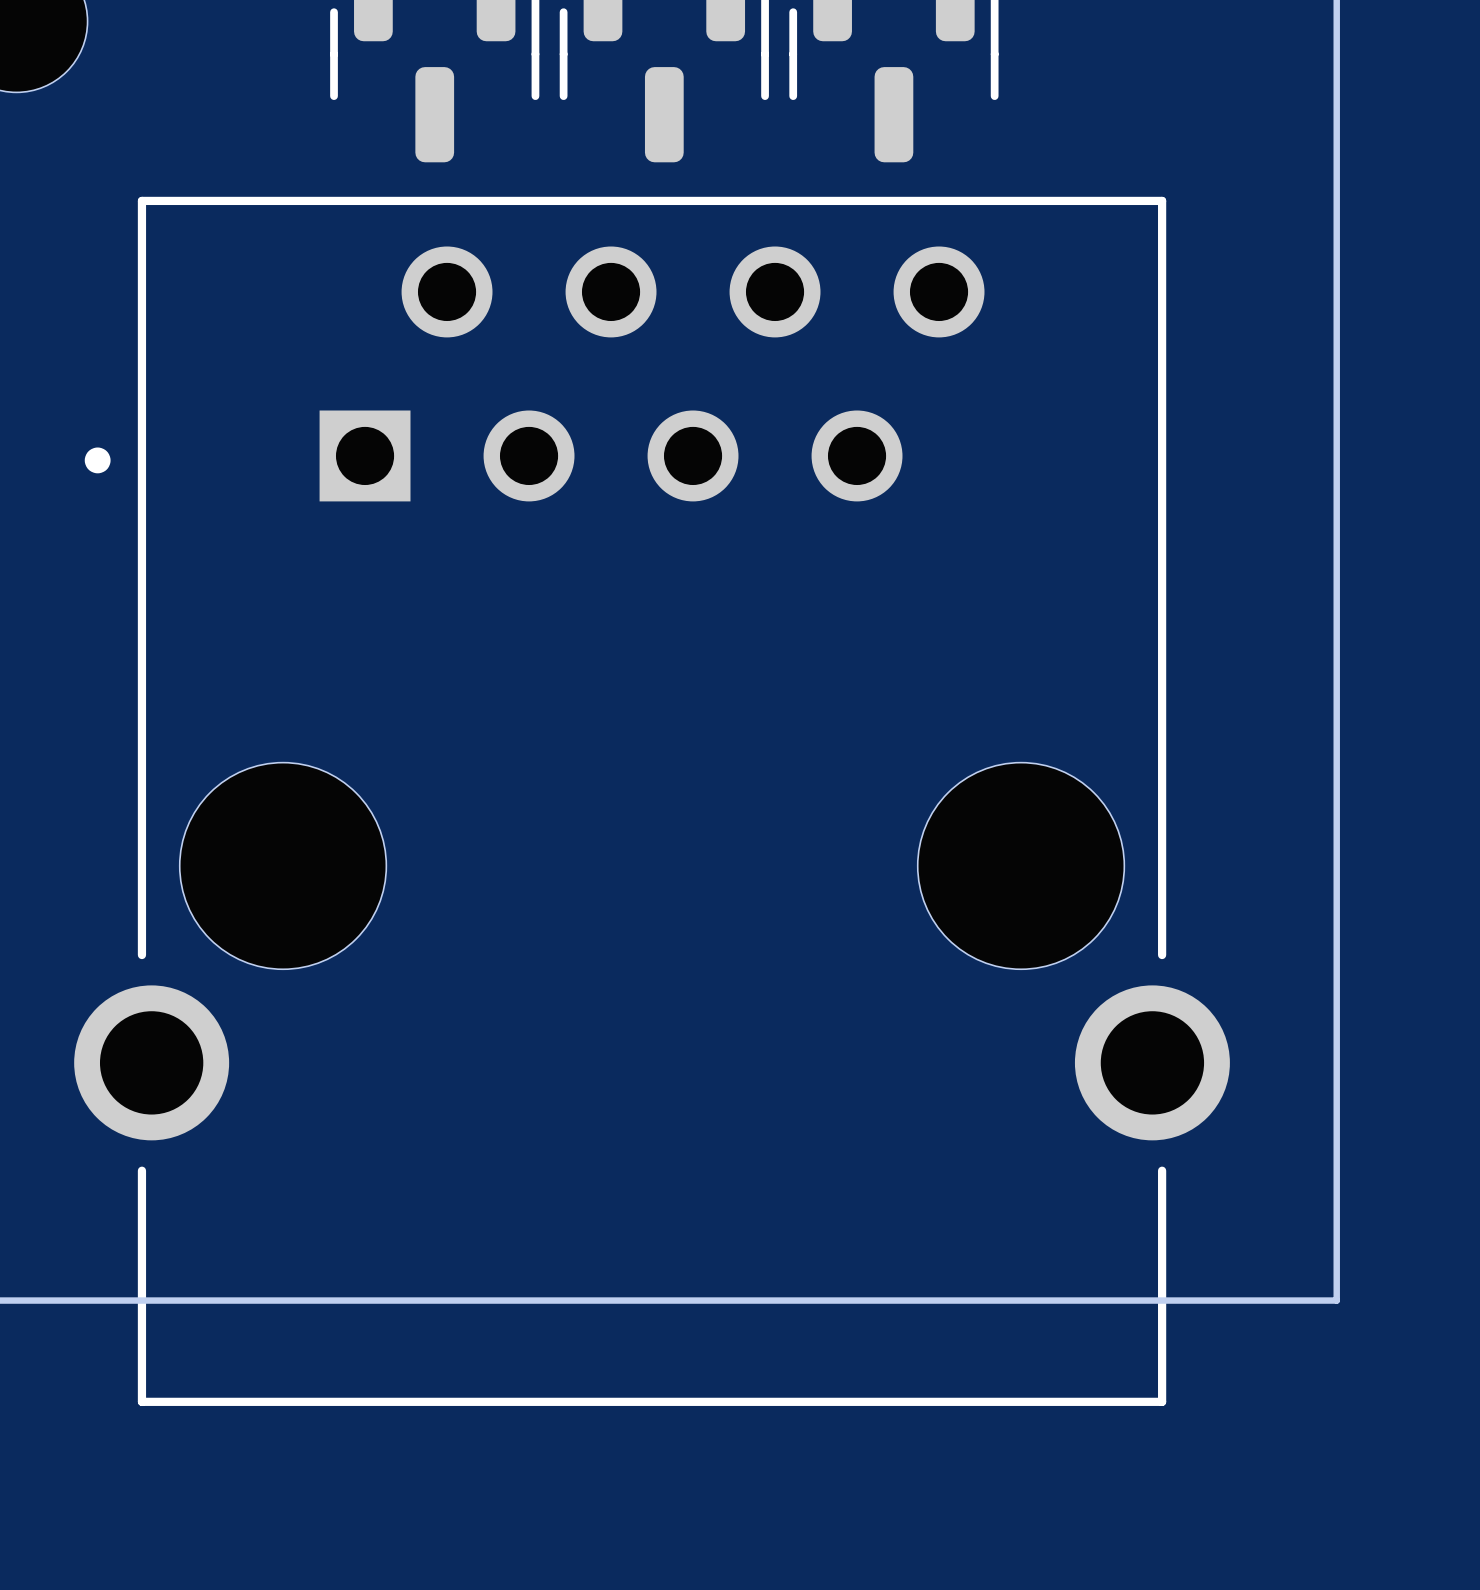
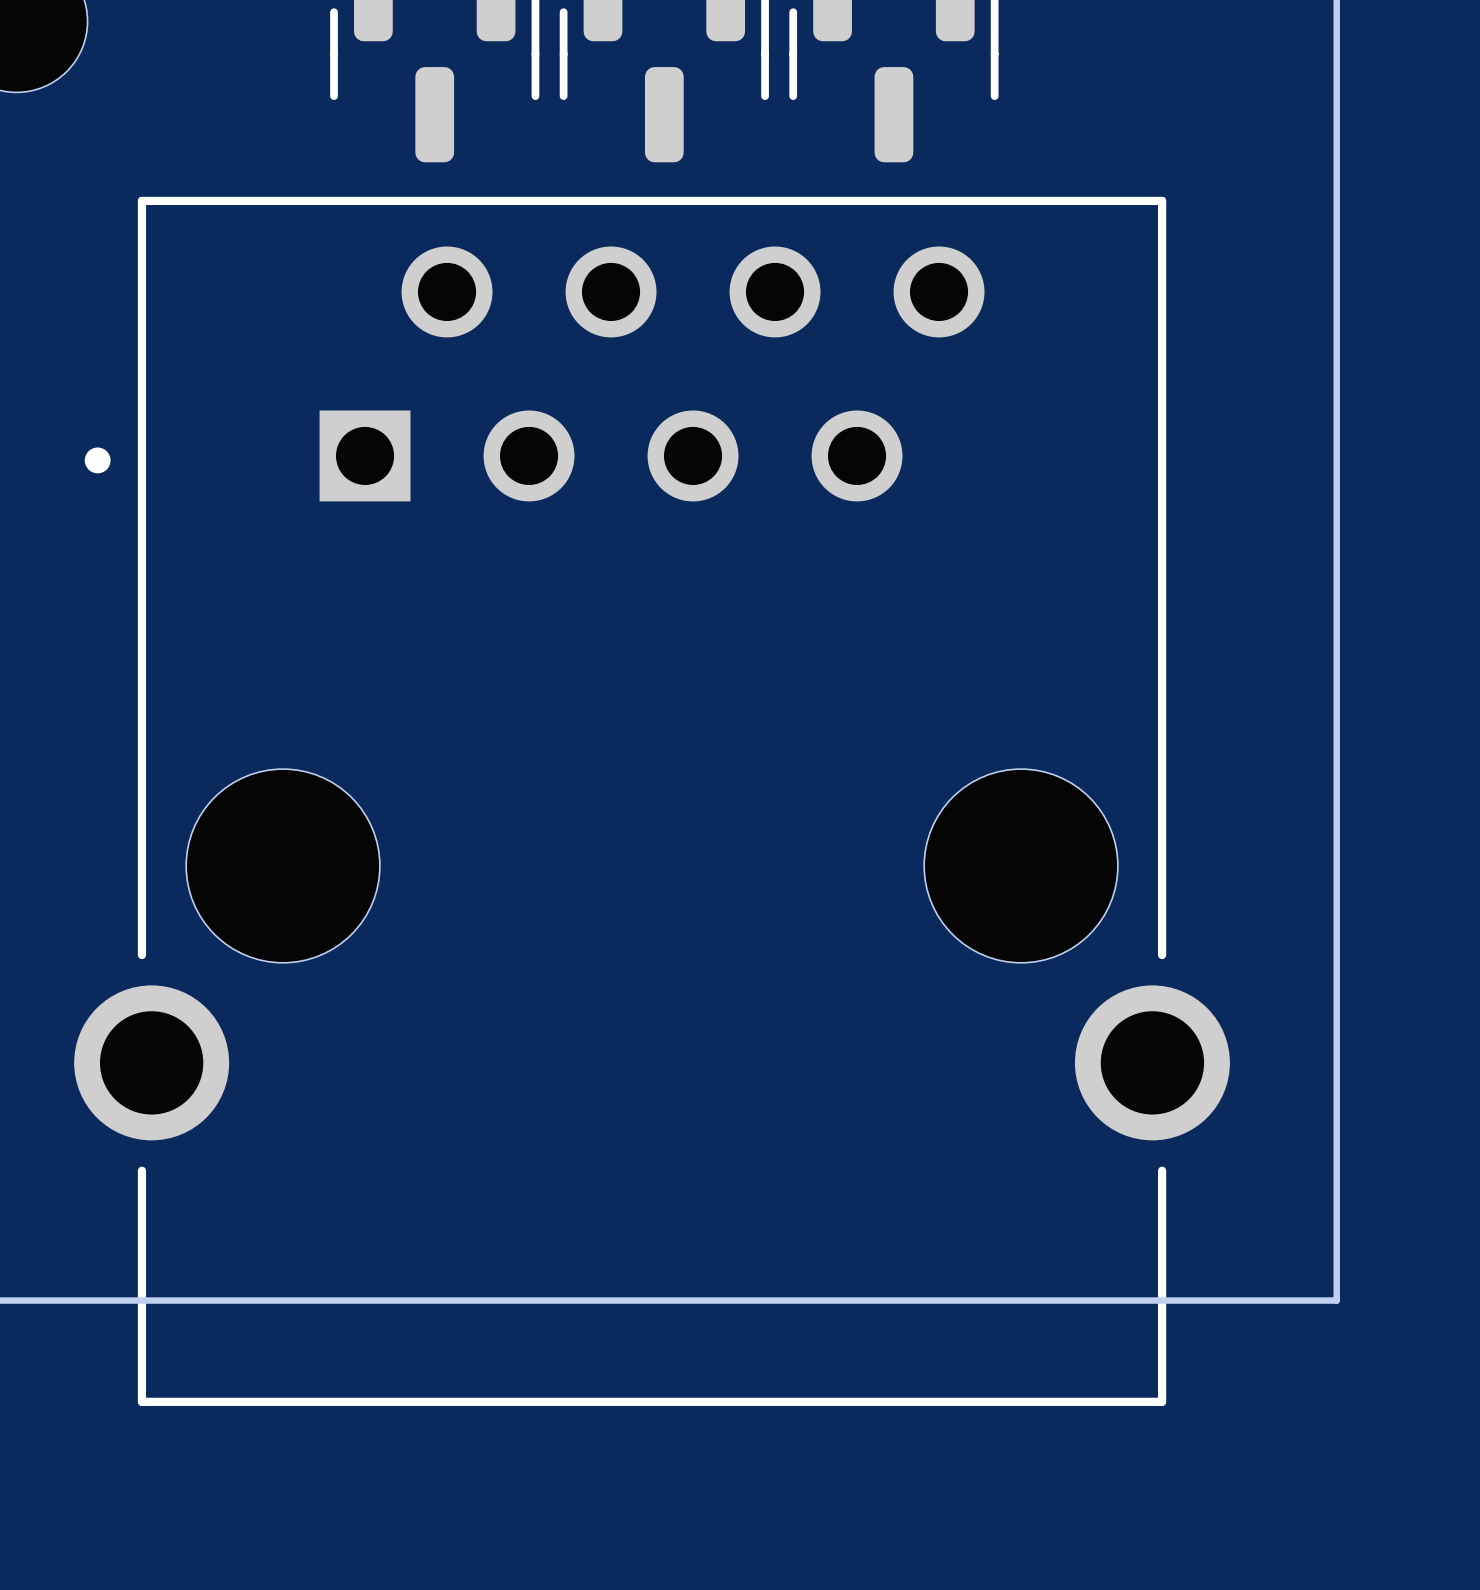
part footprint: [74, 196, 1230, 1406] -> [74, 196, 1230, 1406]

